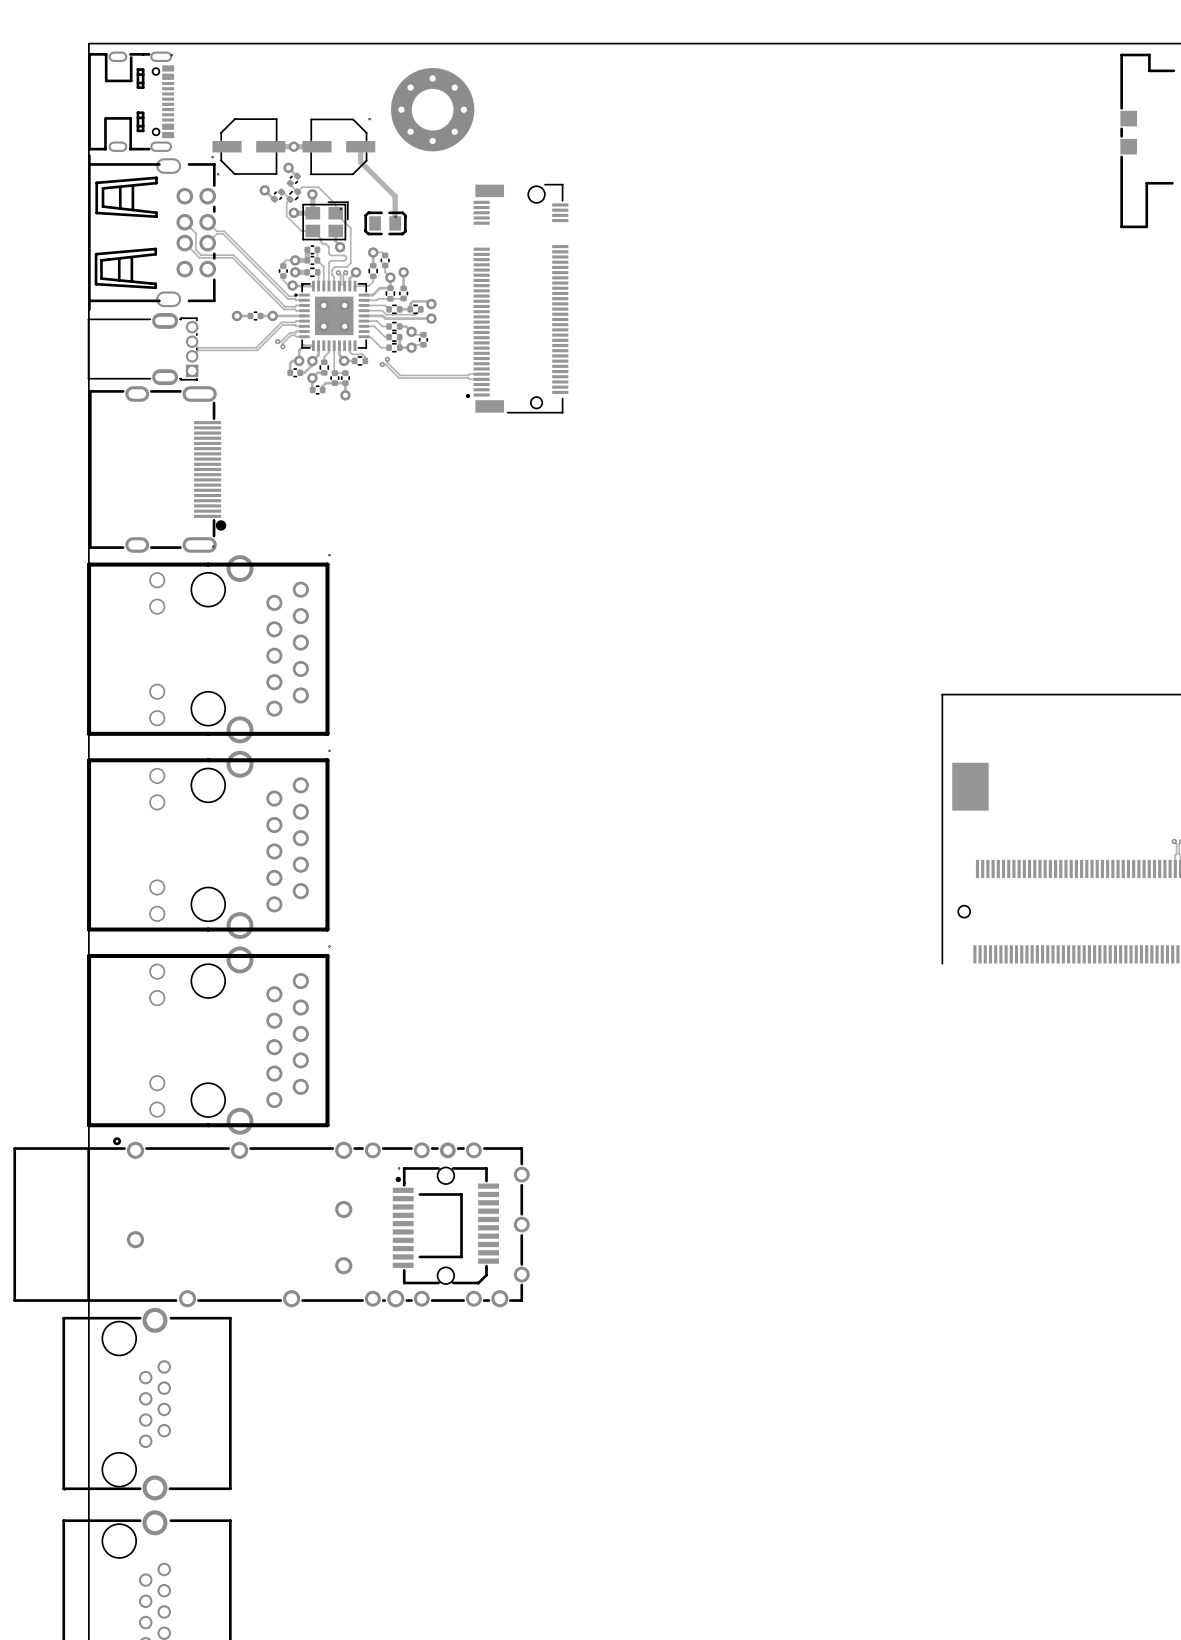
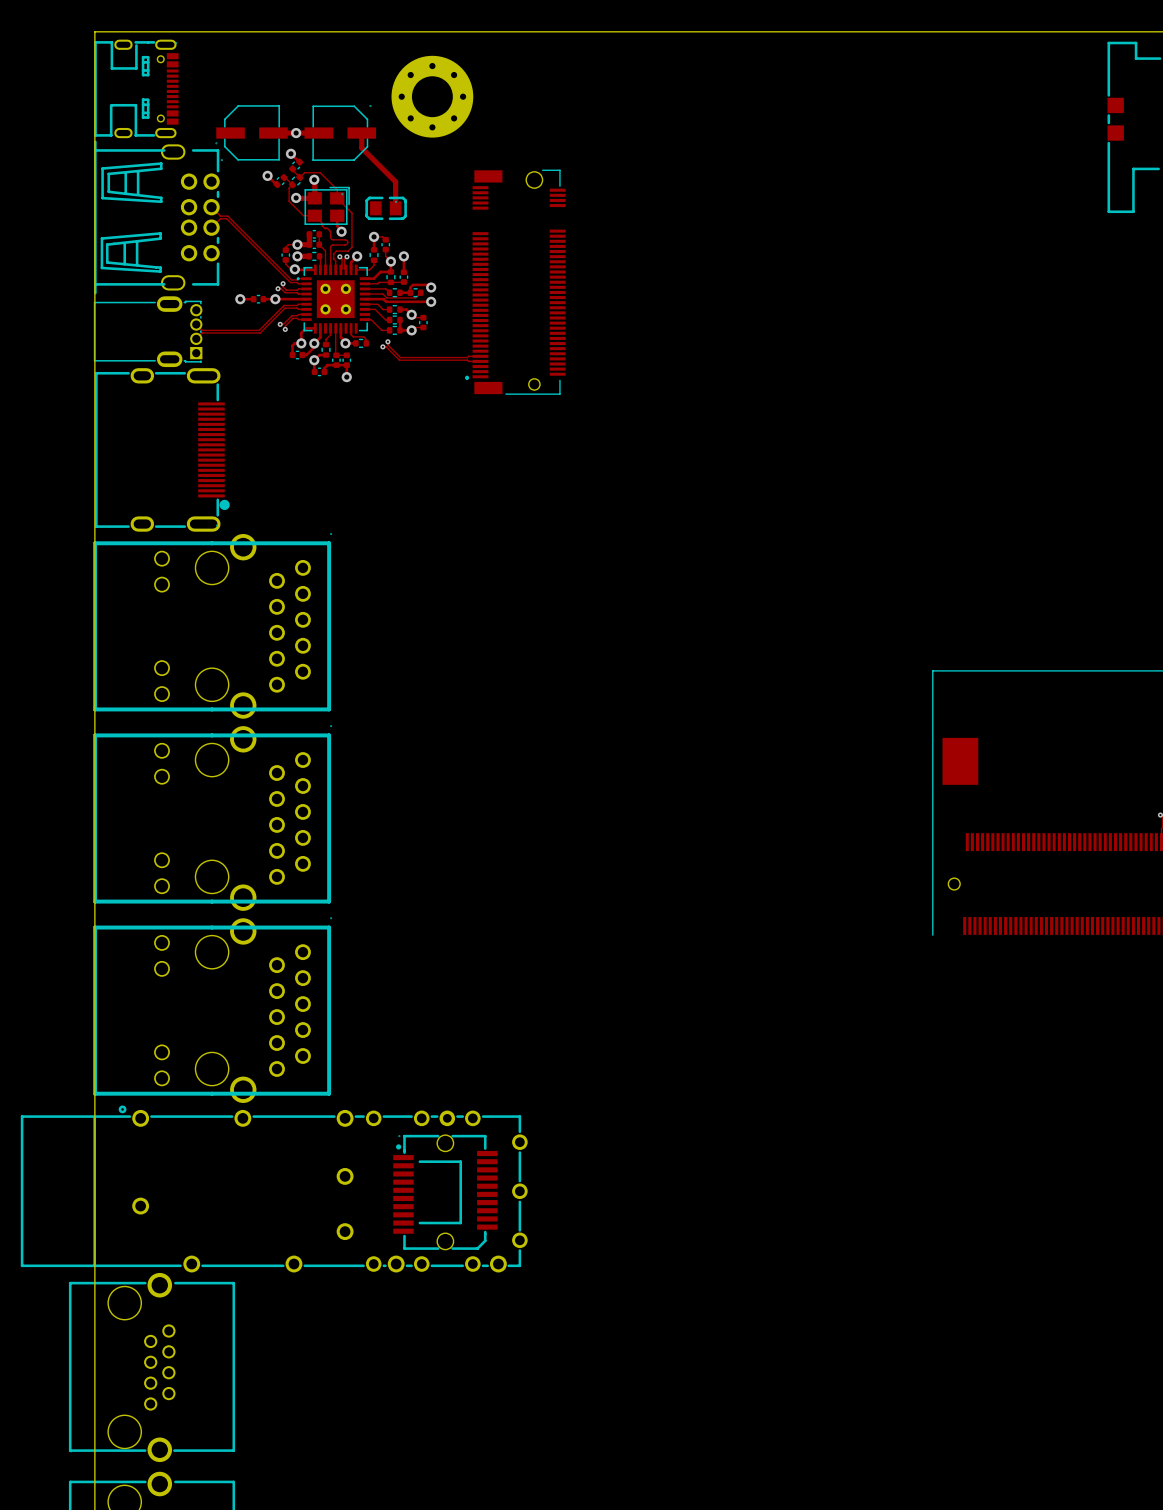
track: (184, 222) (195, 233) (195, 249) (201, 255) (233, 255) (285, 306) -> (283, 283) (283, 286) (287, 290)
track: (184, 243) (199, 257) (232, 257) (284, 309) -> (278, 288) (286, 292)
via: none -> (283, 283)
via: none -> (278, 288)

